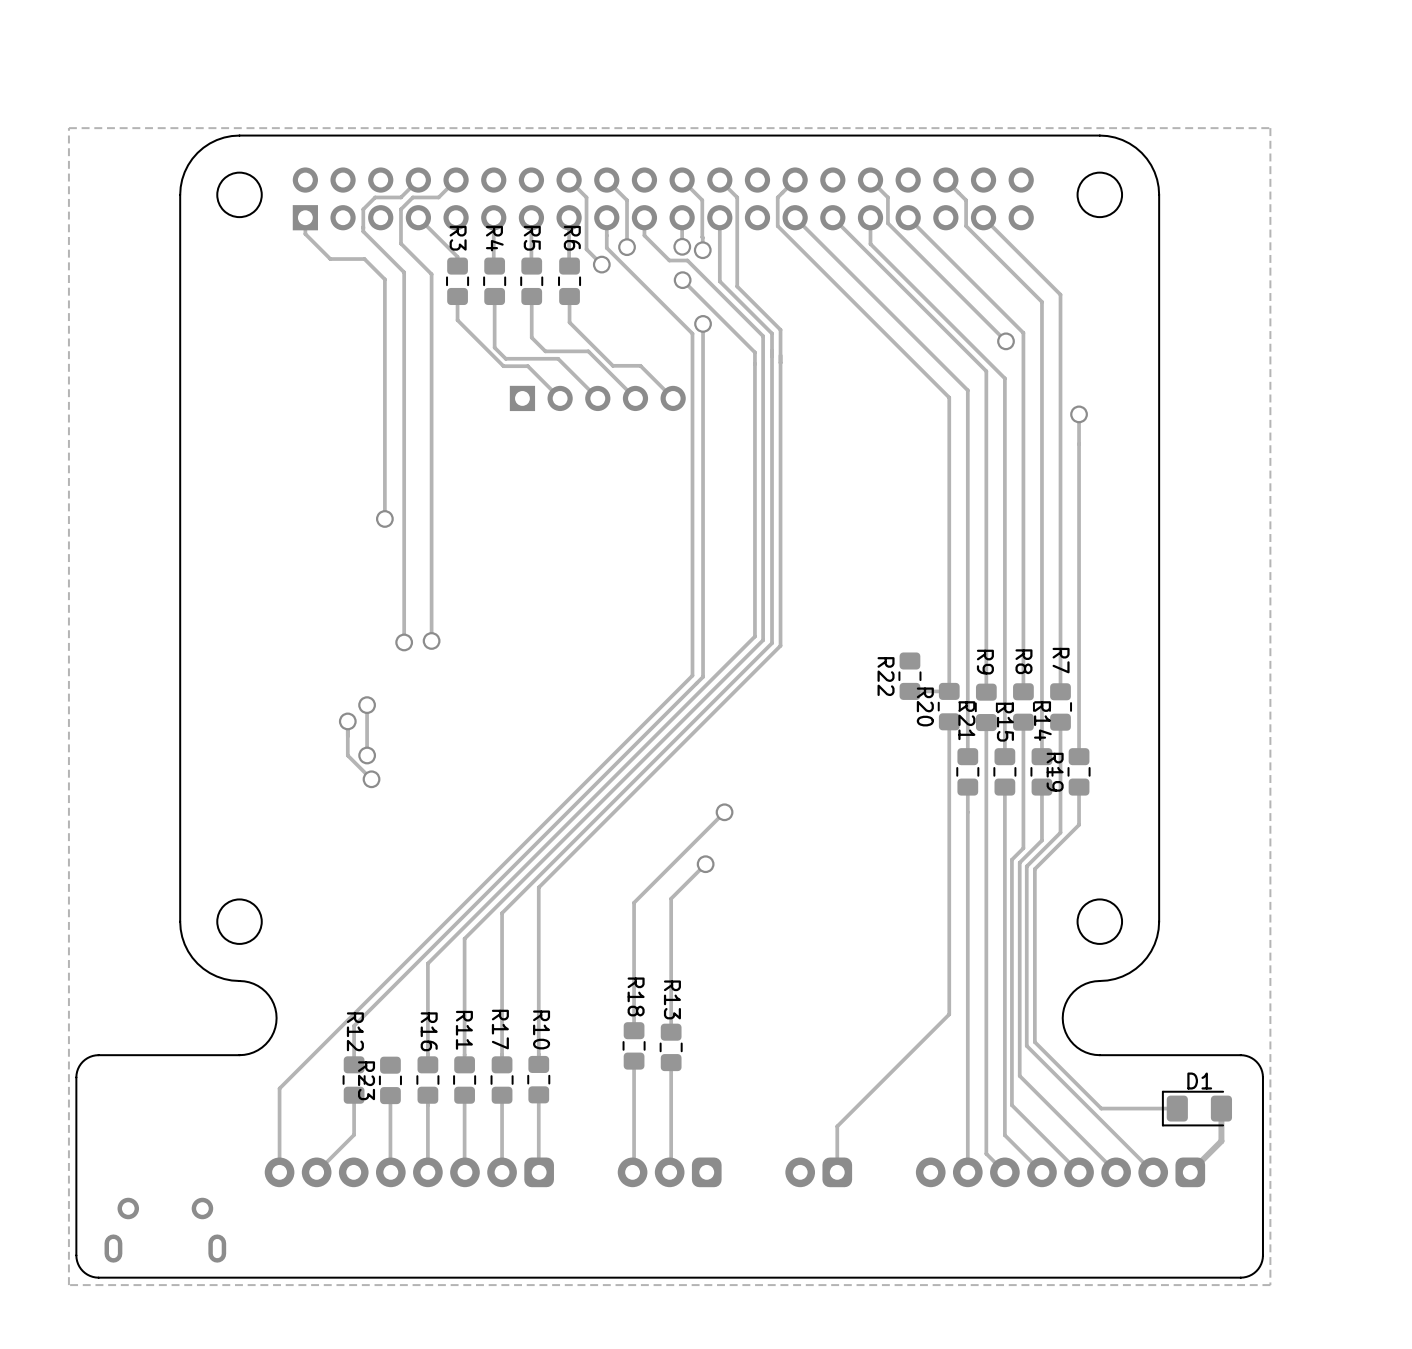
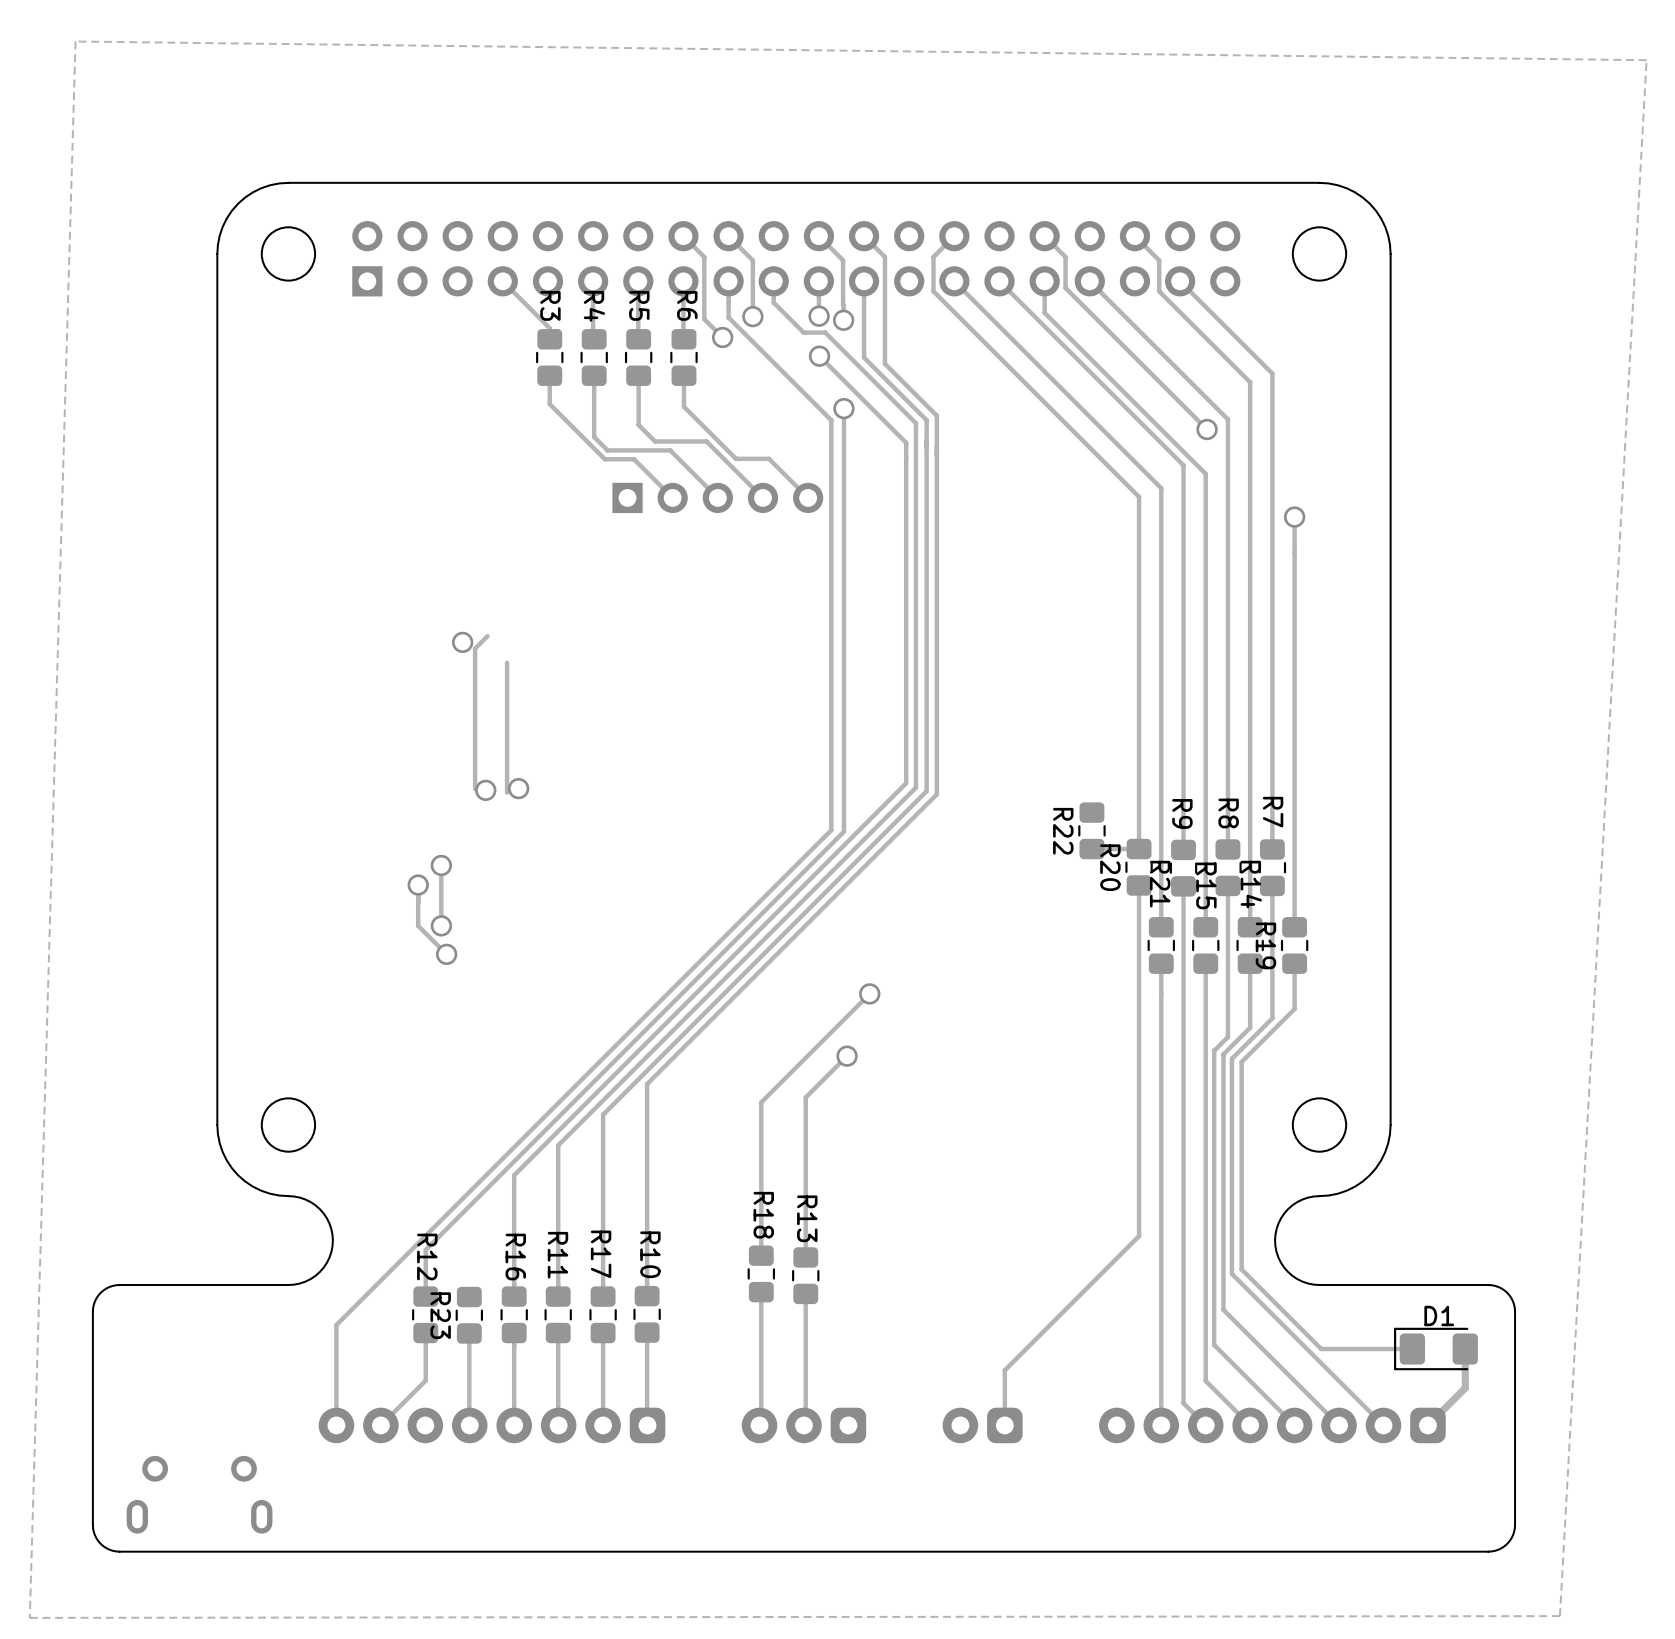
zone outline: (1270, 128) (68, 128) (68, 1285) (1270, 1285) (1270, 128) -> (75, 41) (1646, 60) (1559, 1616) (29, 1617) (75, 41)
track: (418, 180) (400, 197) (375, 197) (363, 209) (363, 231) (404, 272) (404, 642) -> none
track: (456, 180) (438, 197) (412, 197) (400, 209) (400, 243) (431, 274) (431, 640) -> none
track: (305, 217) (305, 234) (330, 259) (364, 259) (384, 279) (384, 518) -> none
track: none -> (487, 636) (475, 648) (475, 789)
track: none -> (507, 662) (507, 792)

